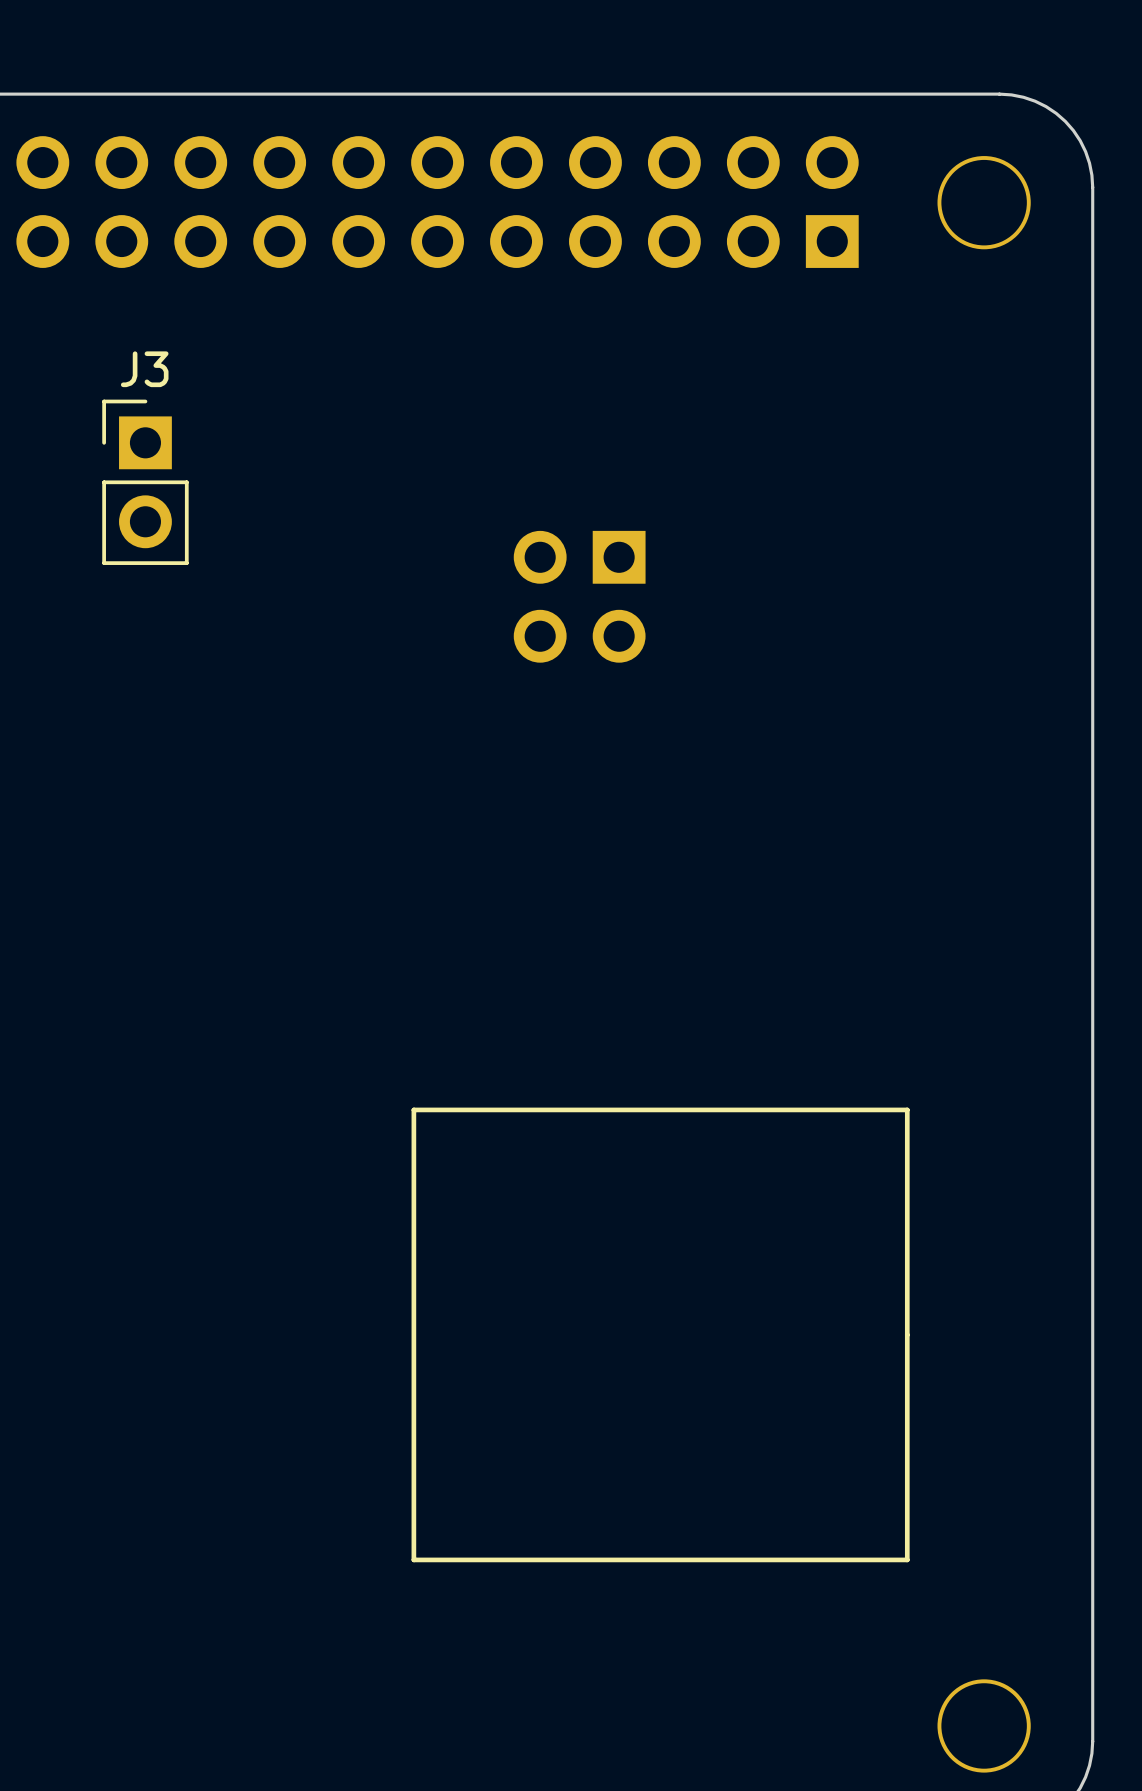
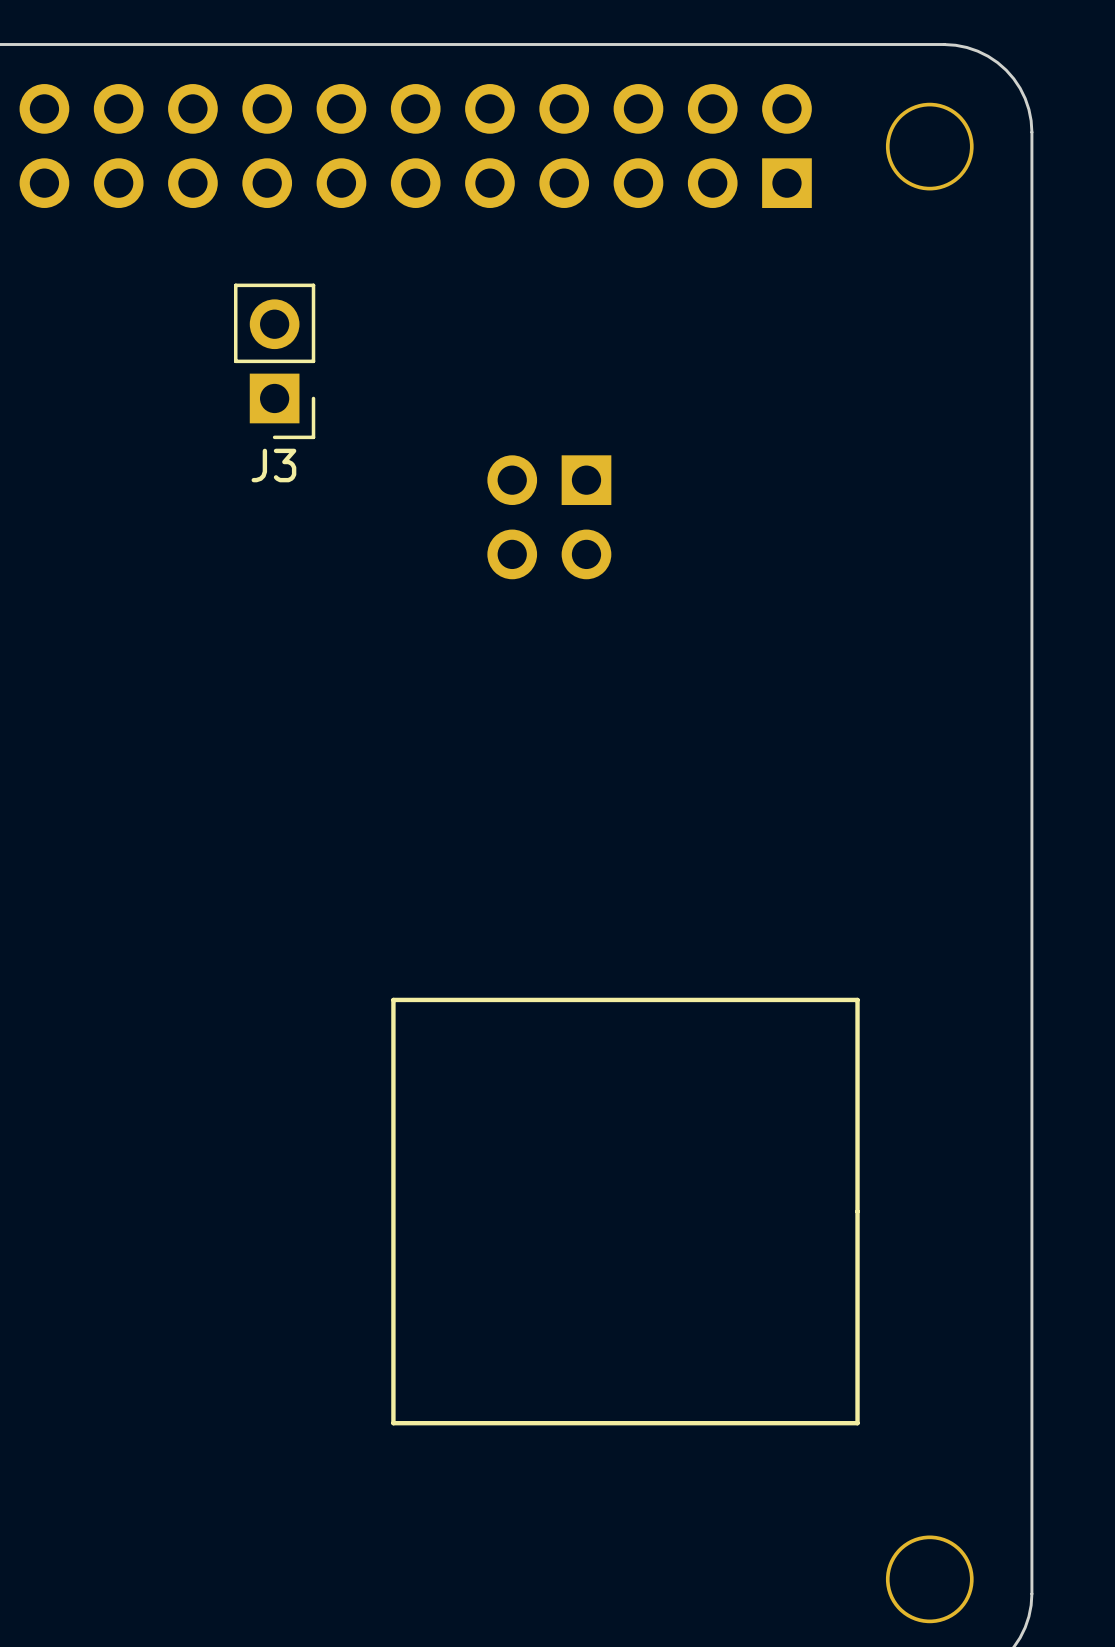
J3 rotation: 0° (145, 482) -> 180° (274, 361)
J3 position: (145, 482) -> (274, 361)

